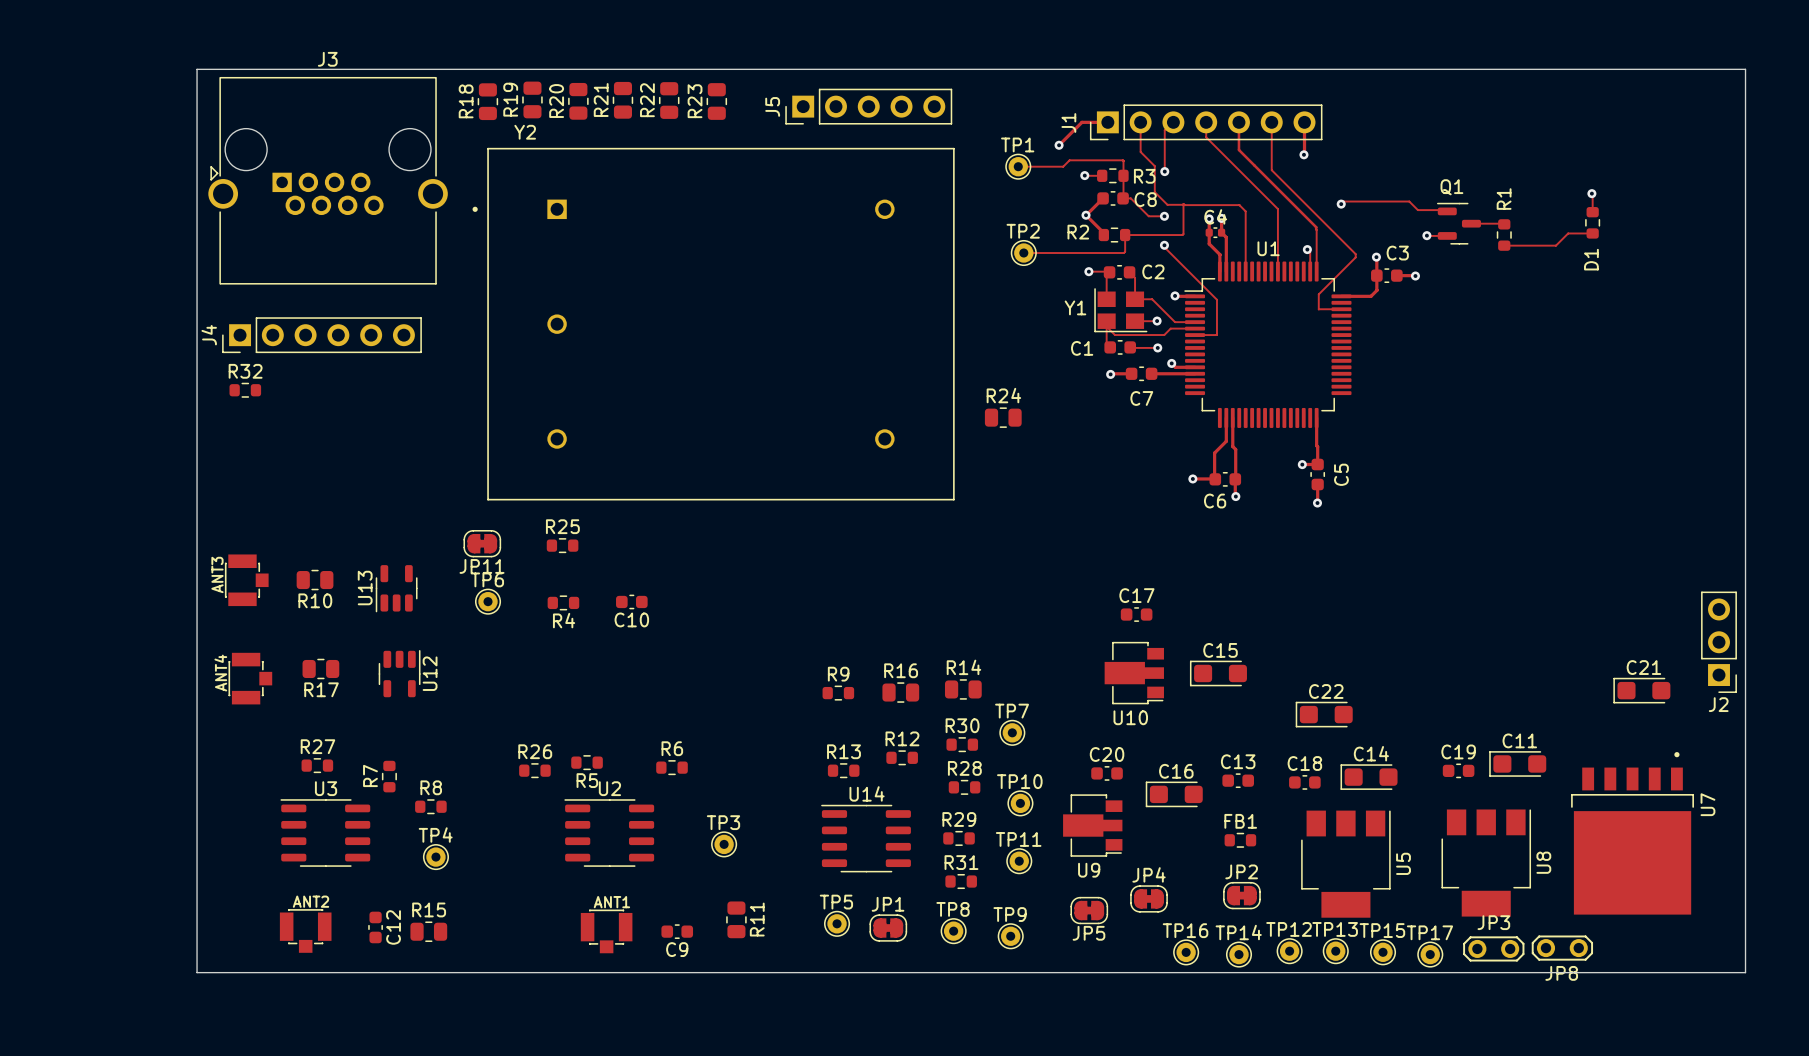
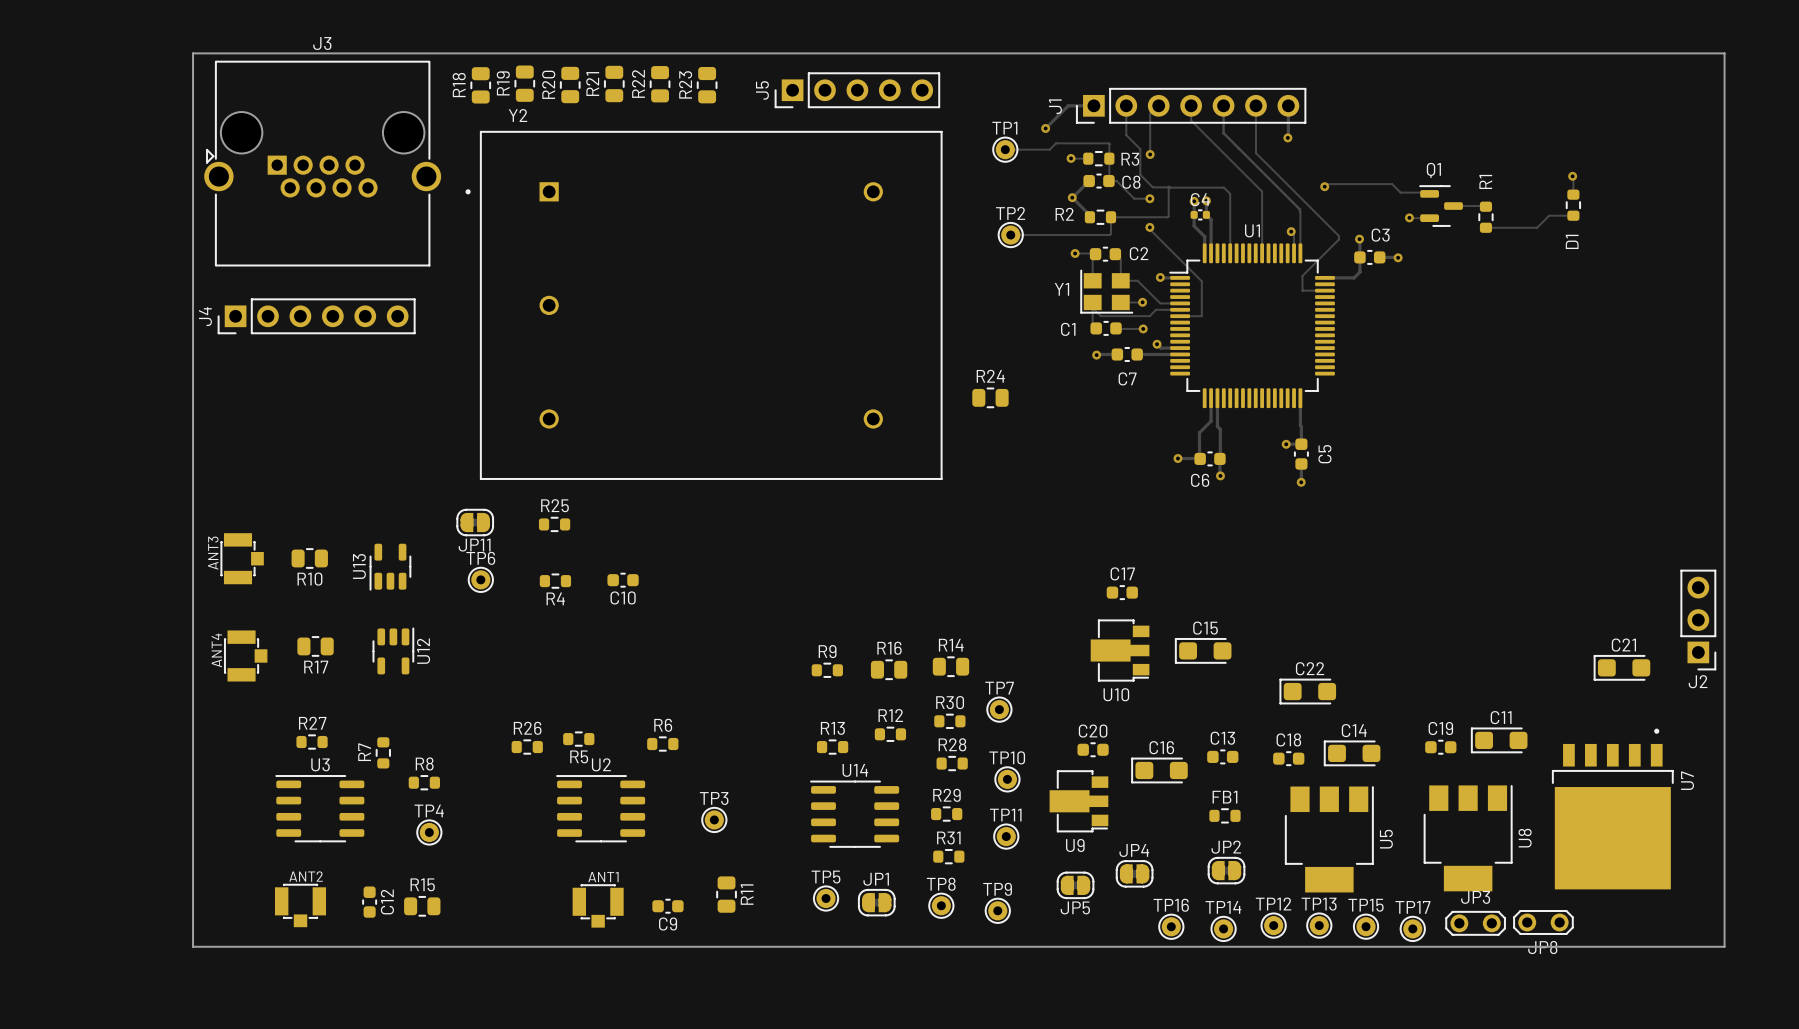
R32: (245, 390) -> none

